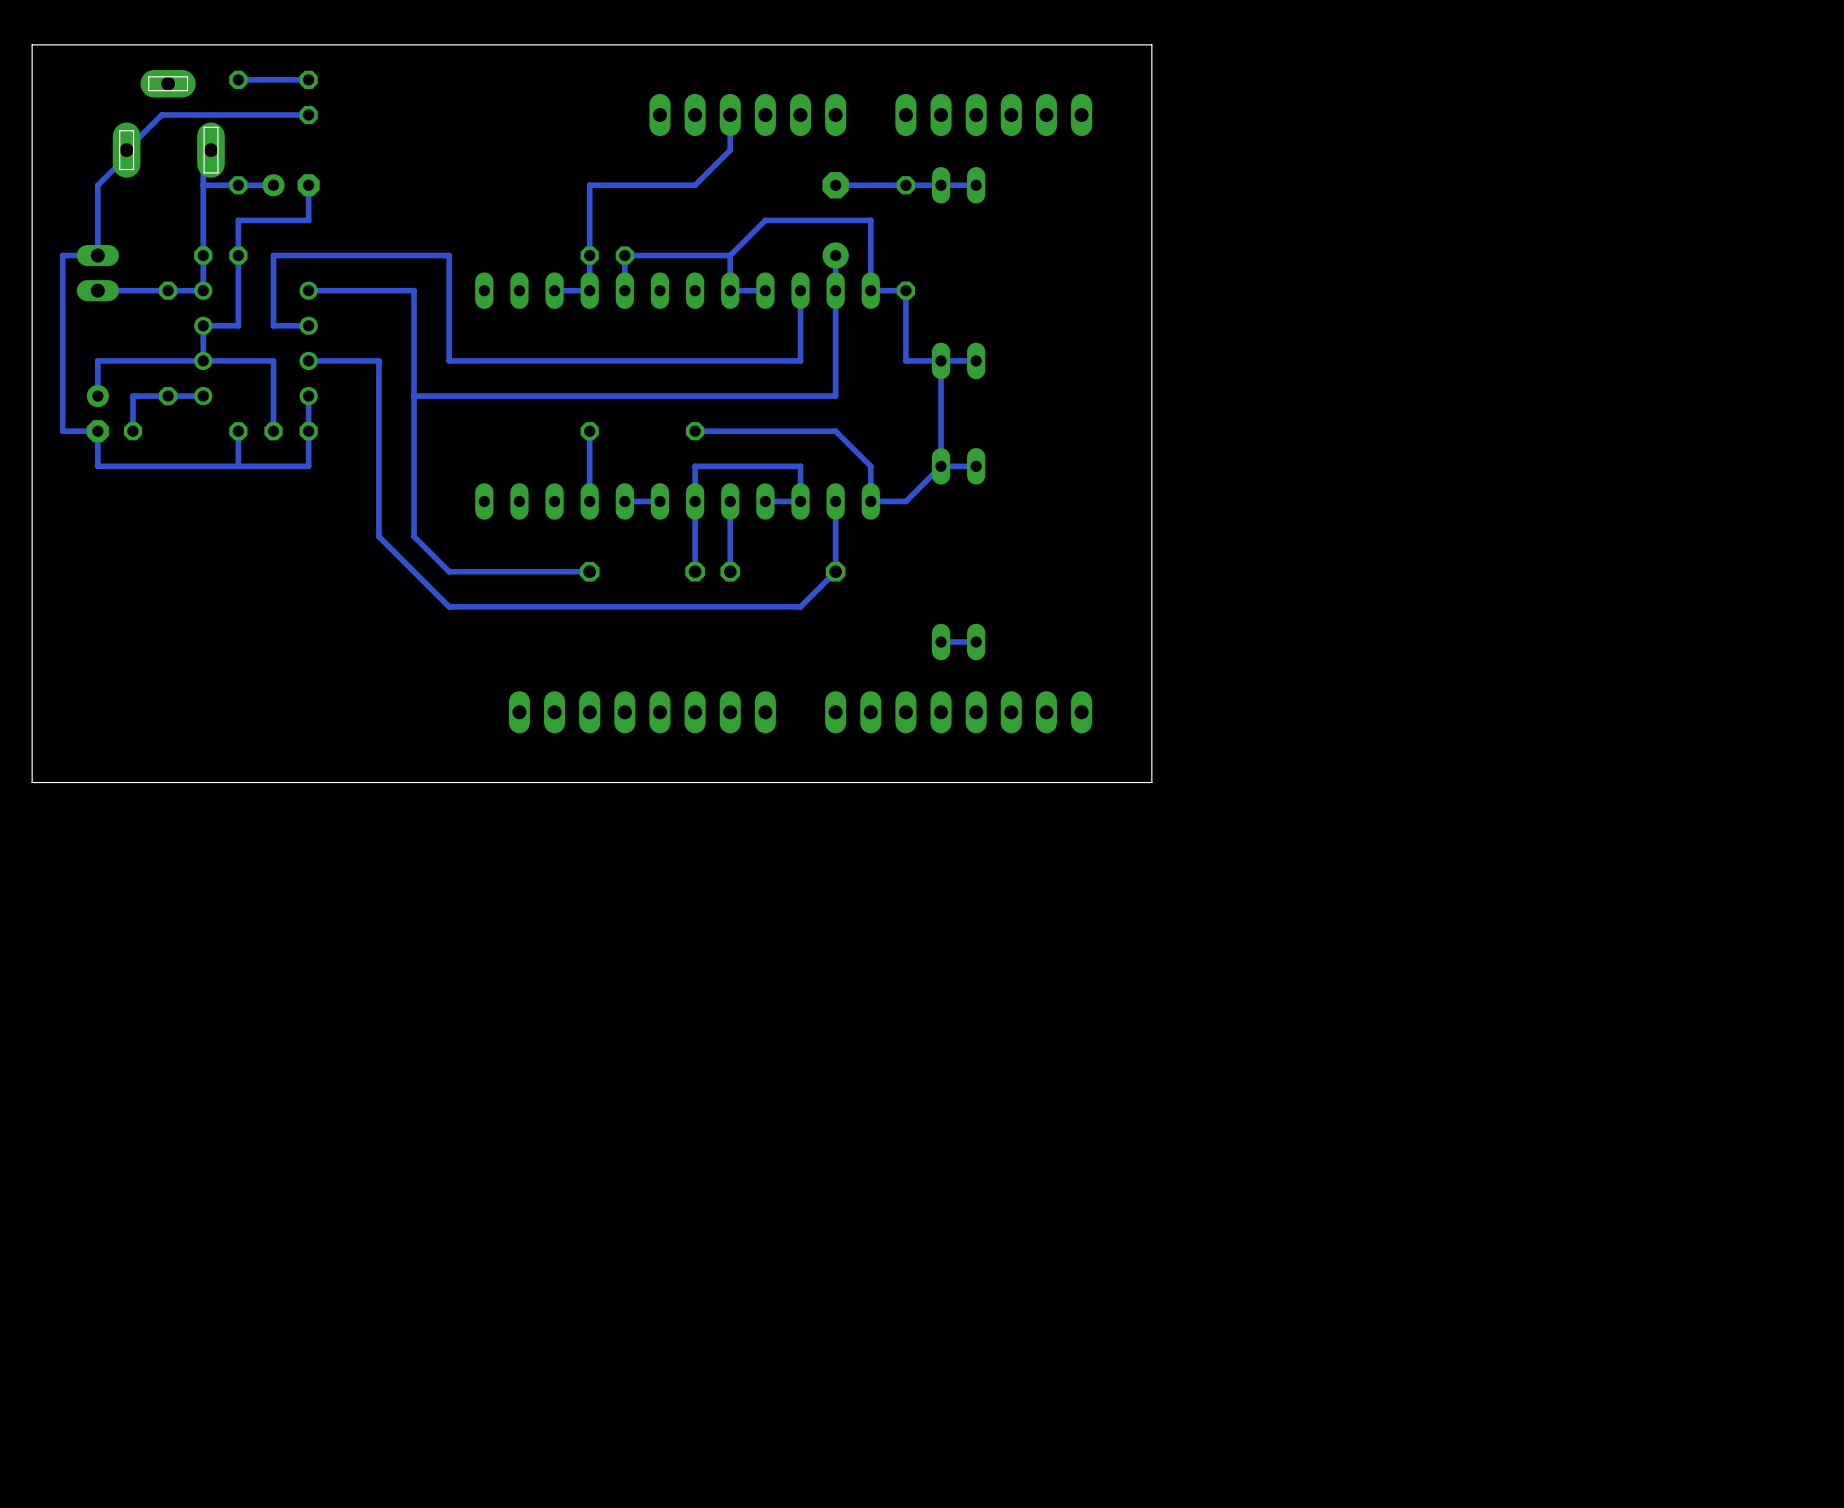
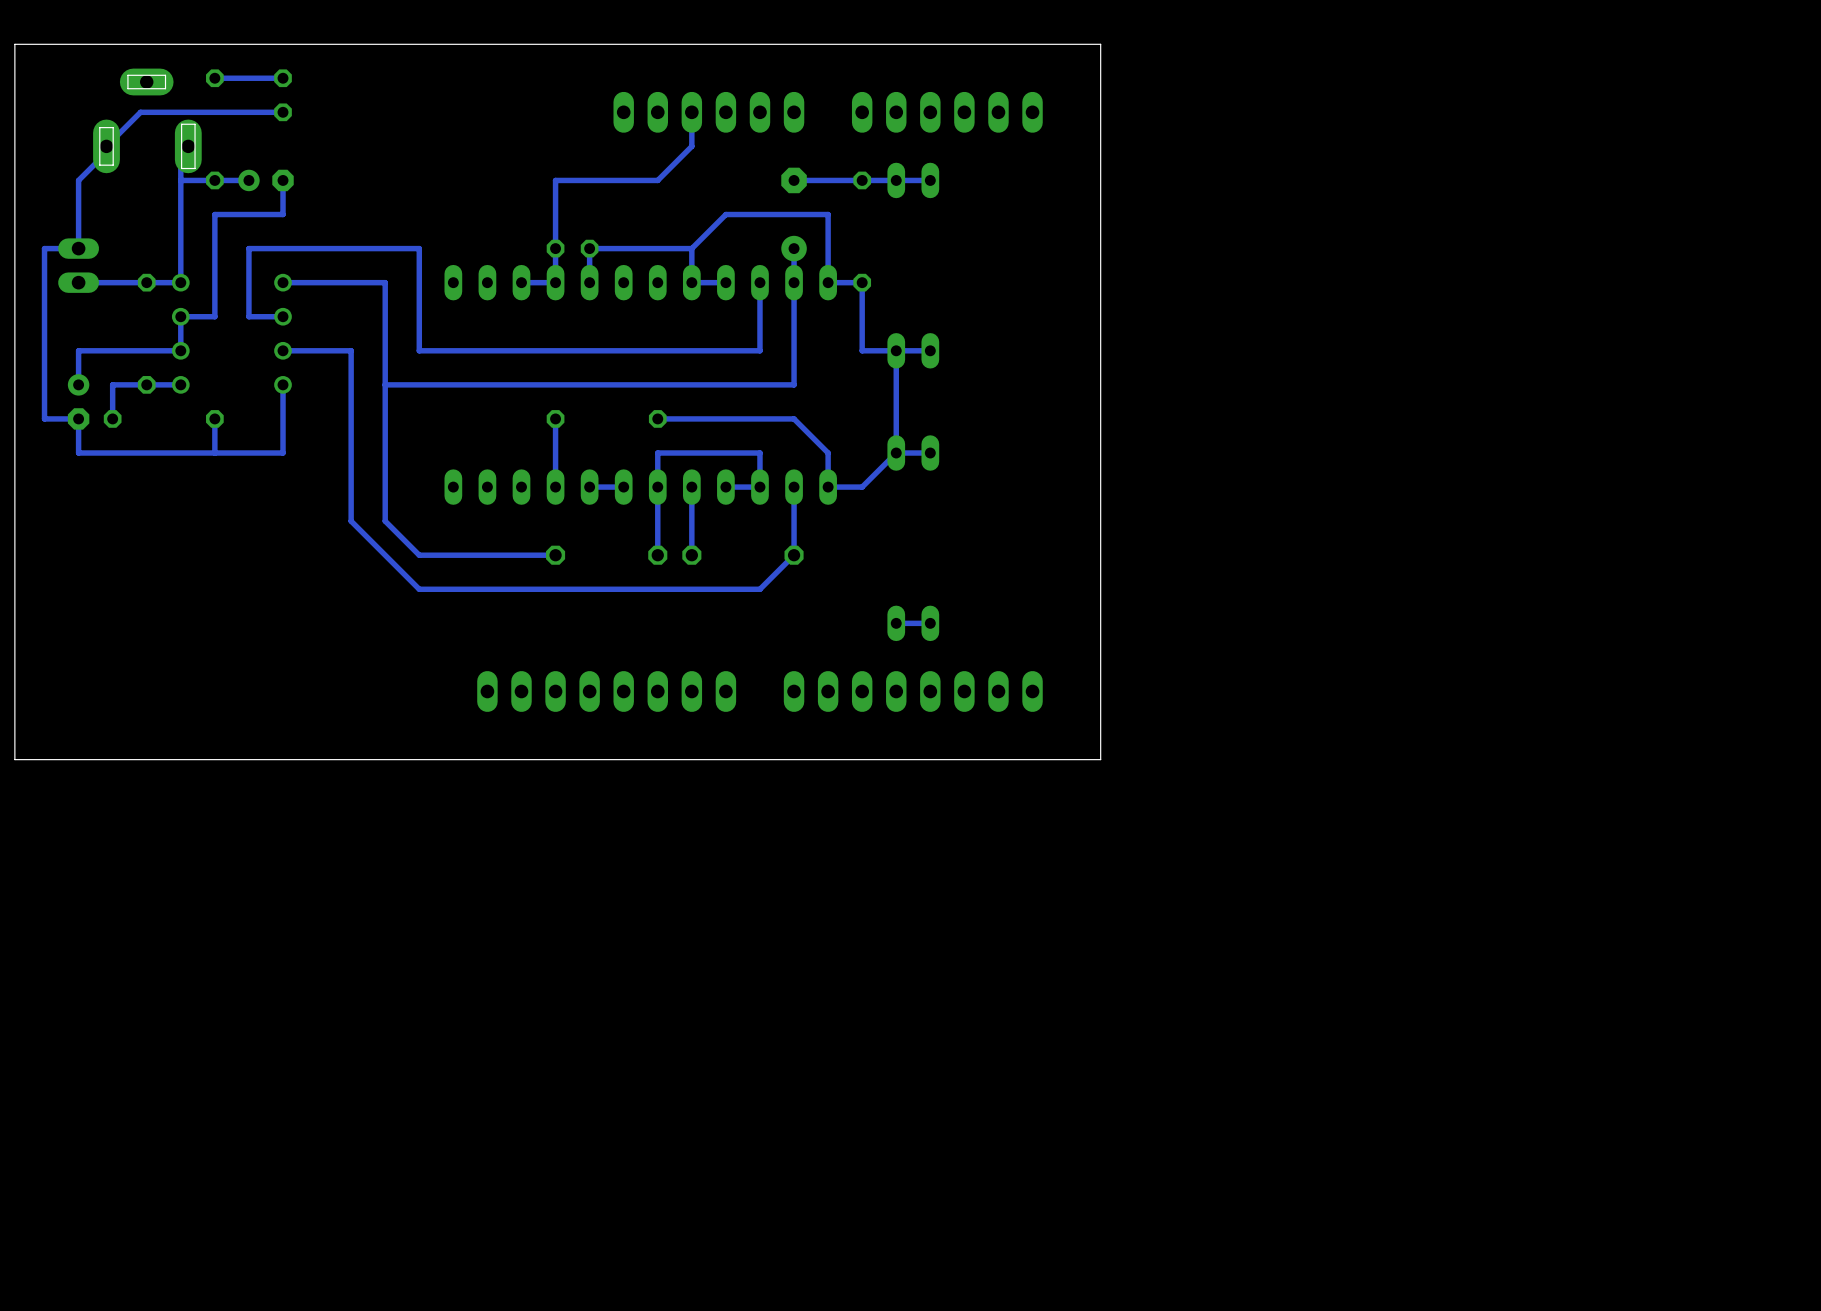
part: (220, 255) -> none
track: (203, 360) (273, 360) (273, 431) -> none
part: (291, 431) -> none

